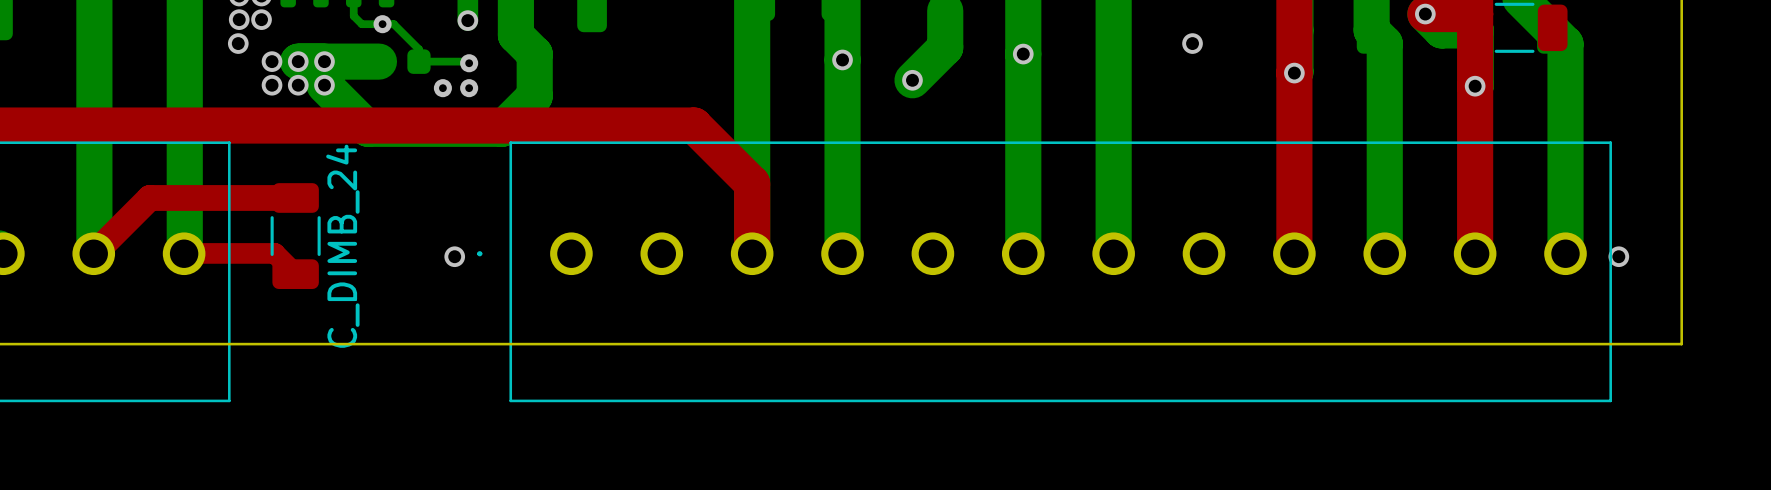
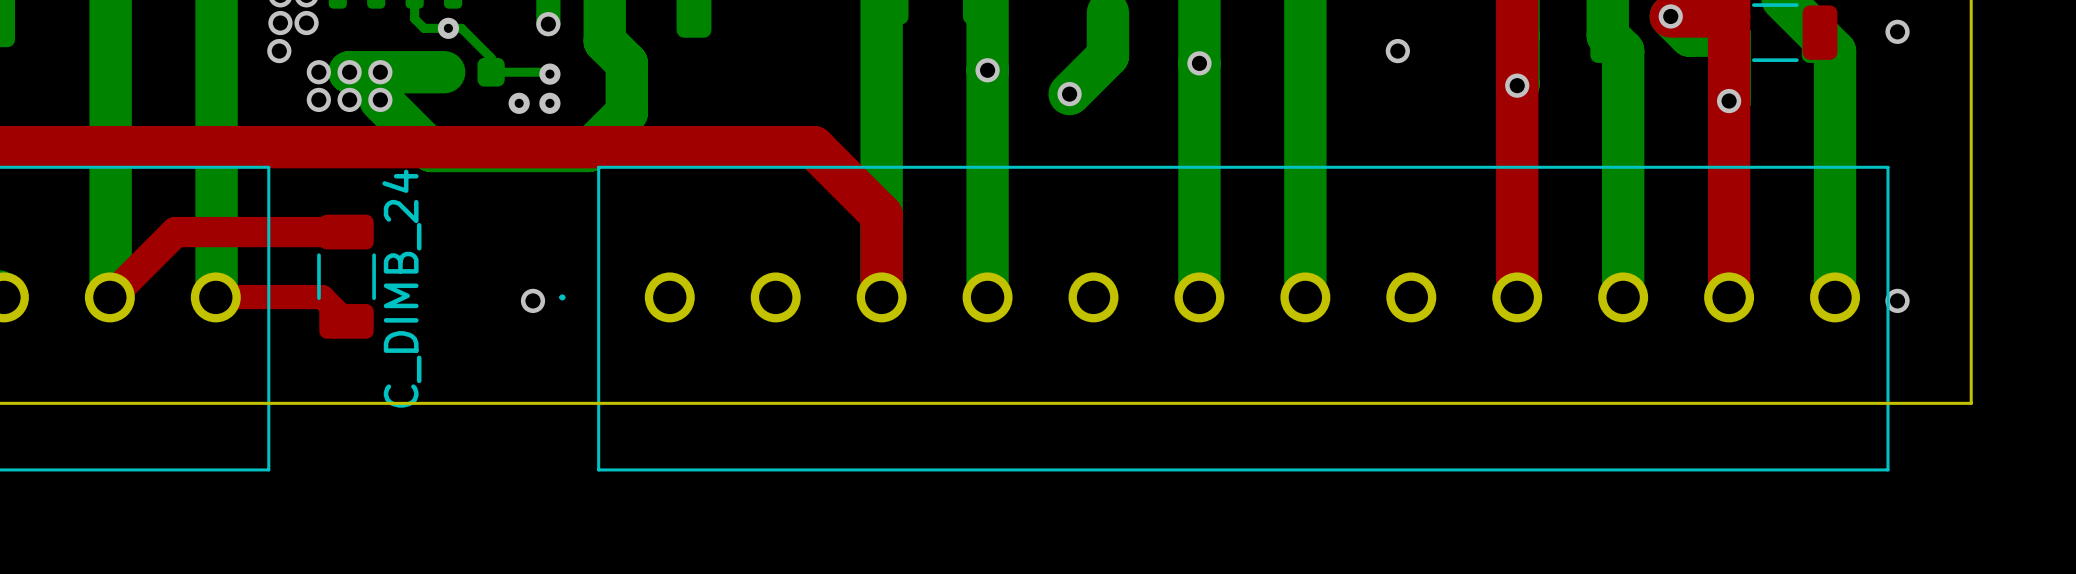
via: none -> (1897, 31)

